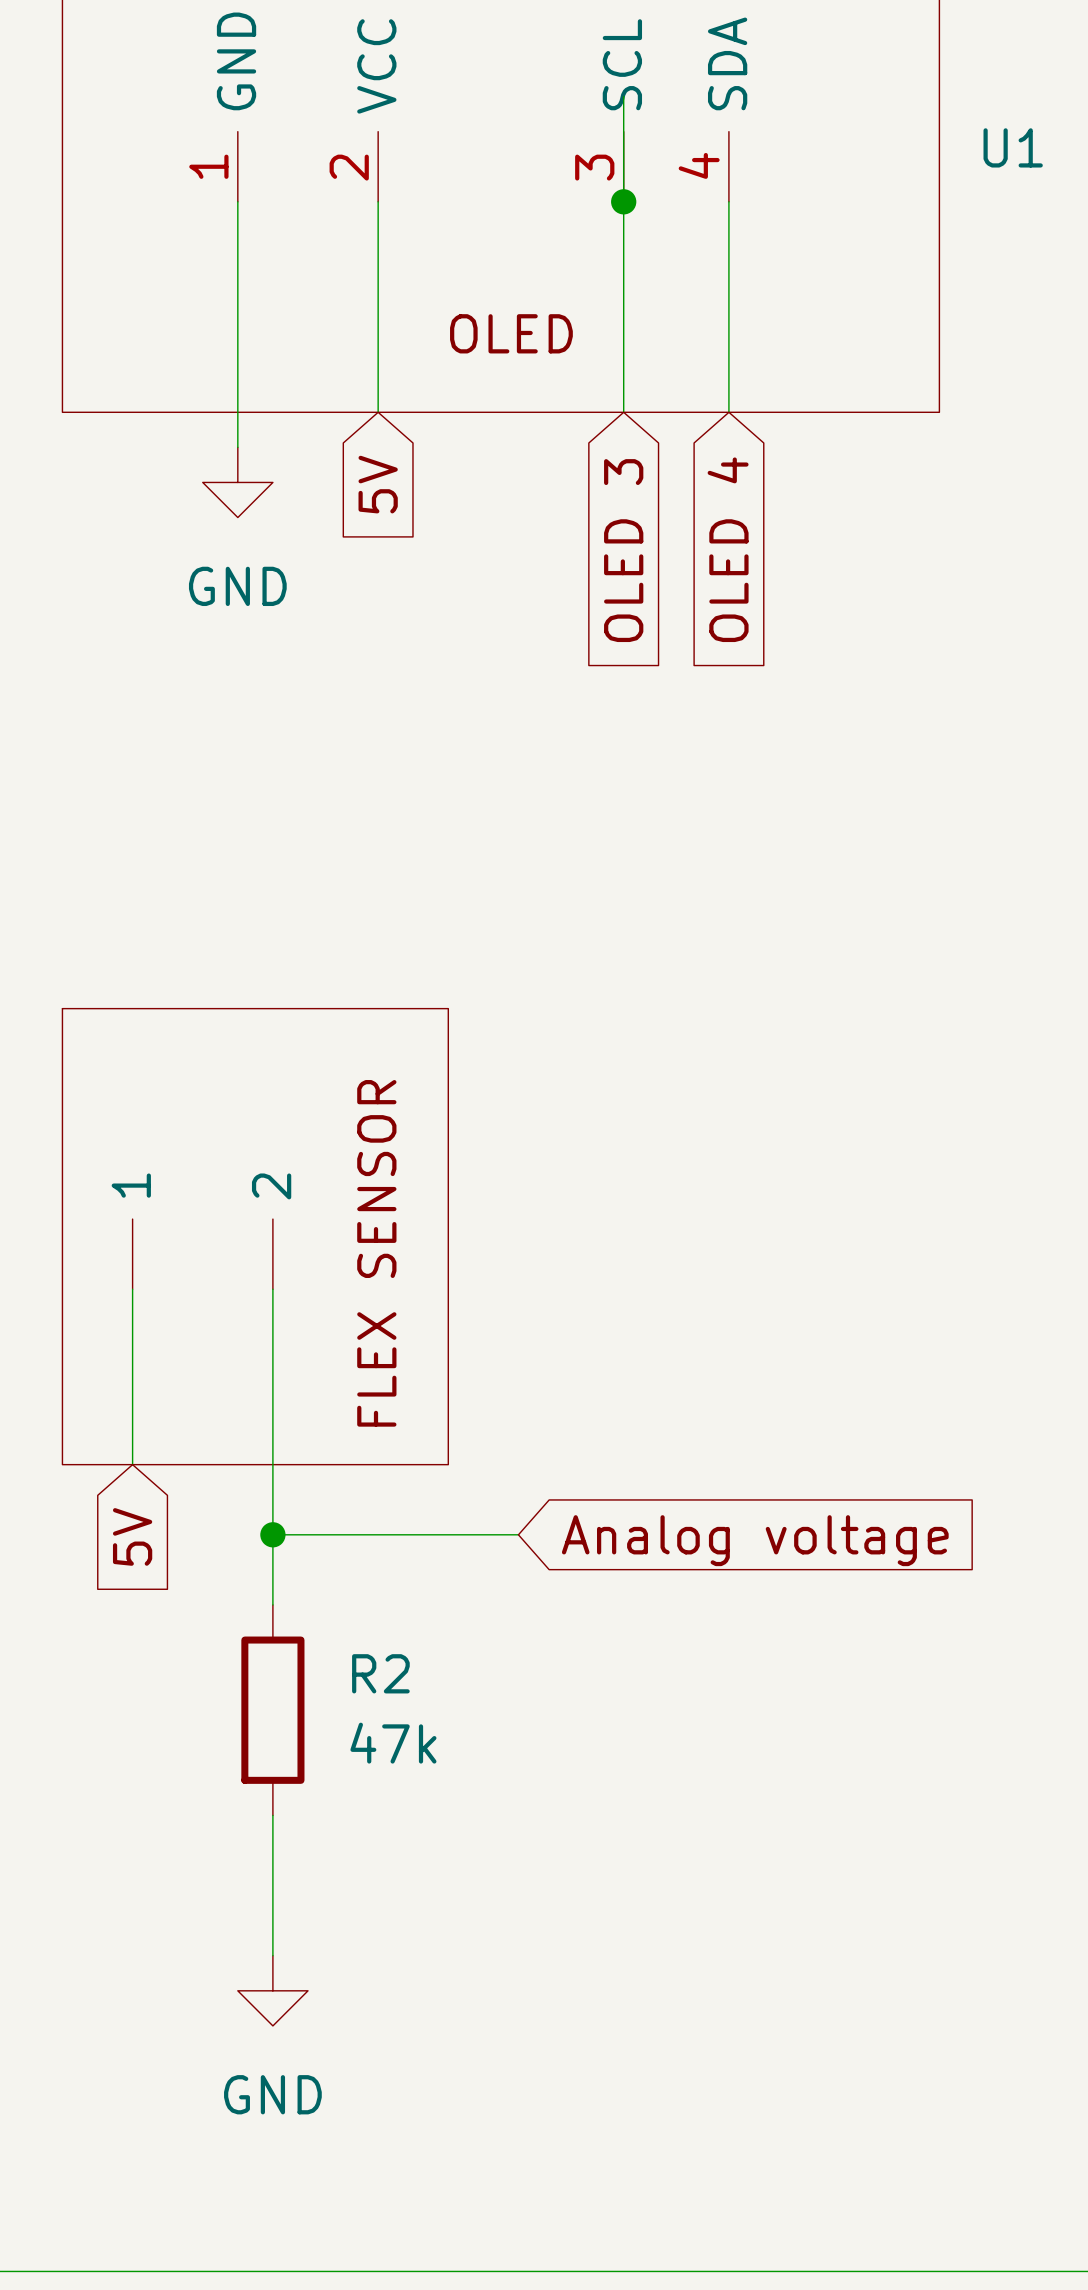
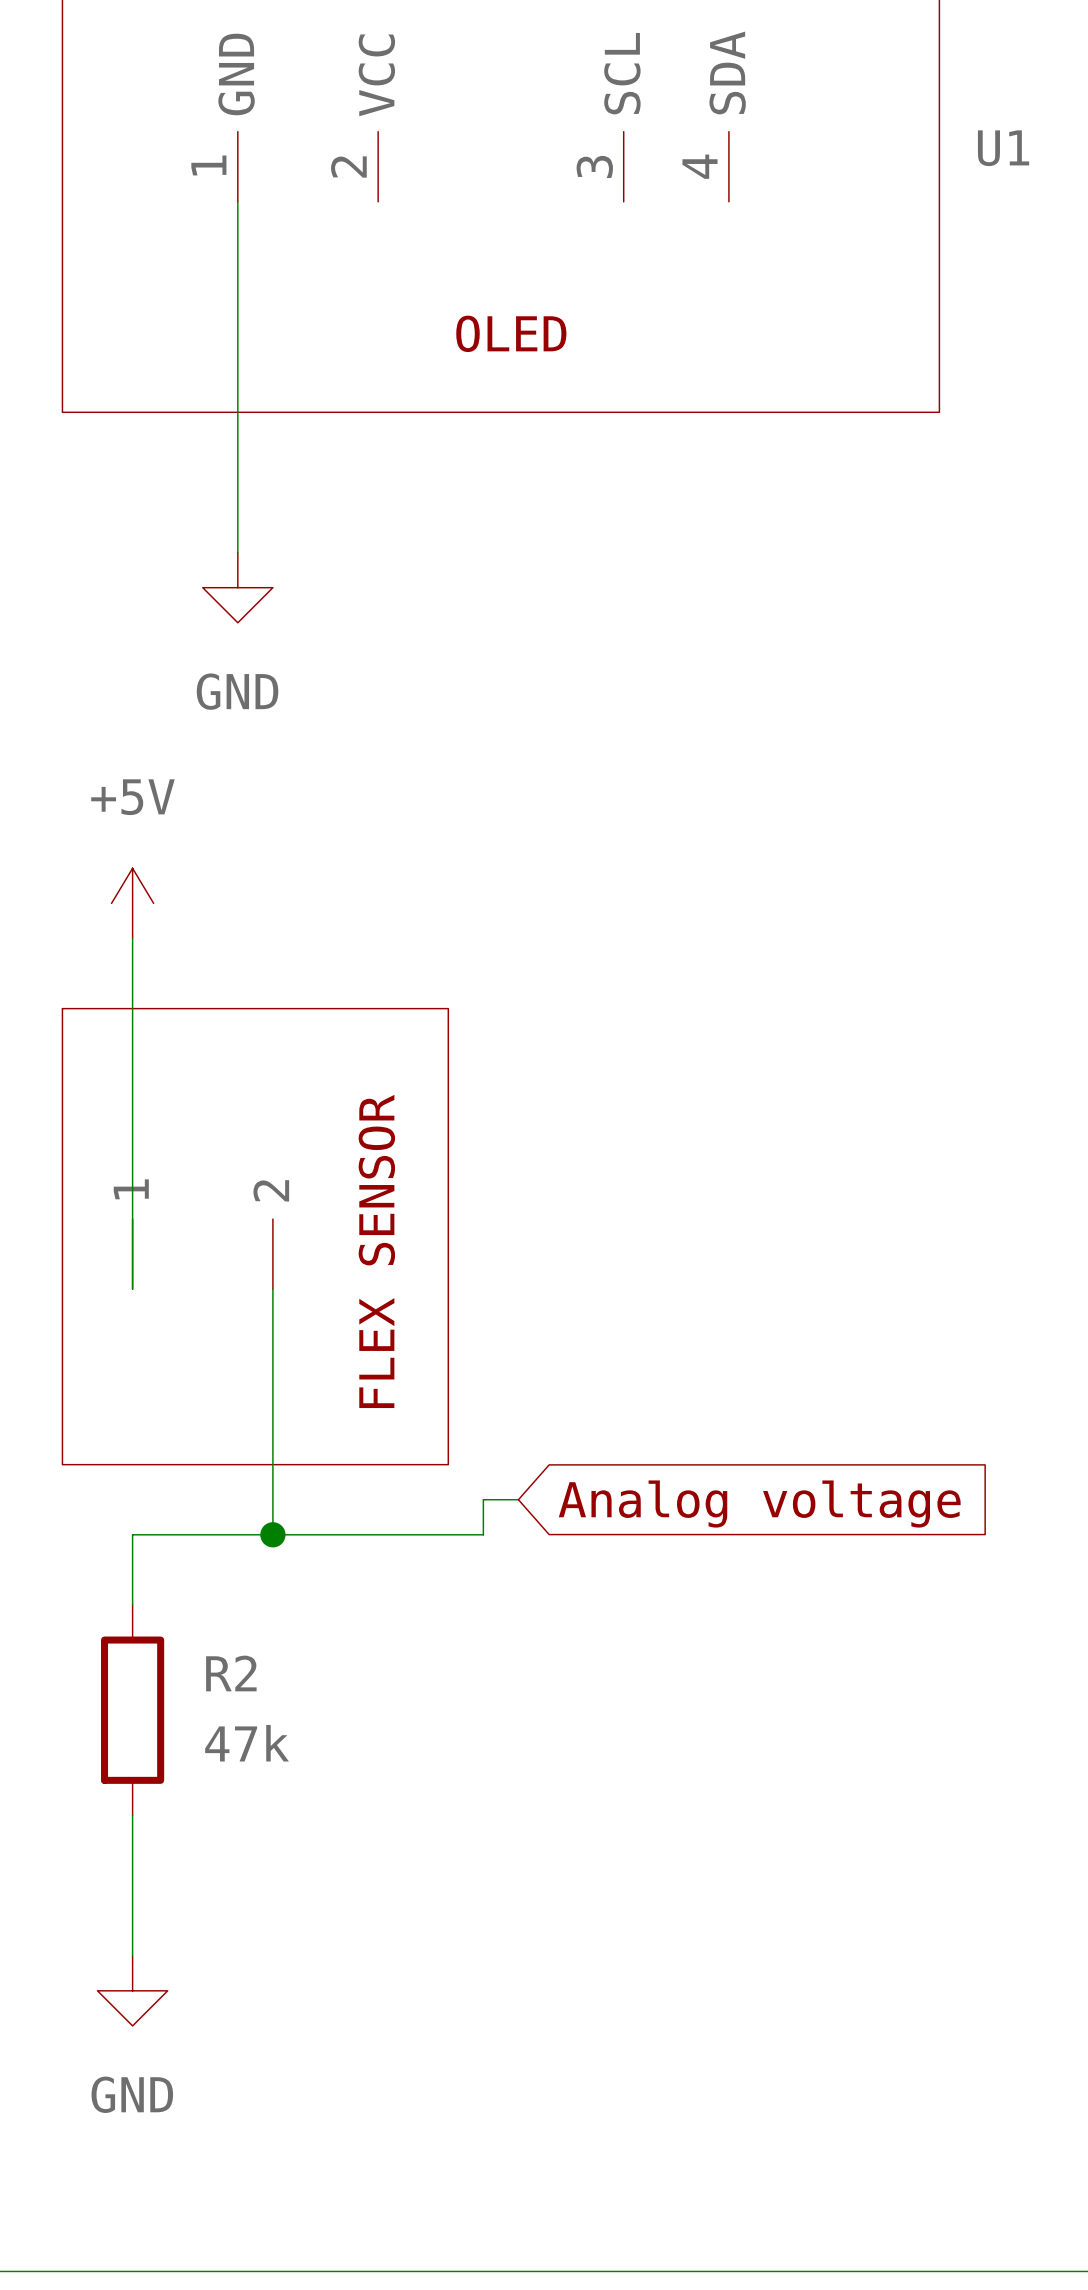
wire: (623, 96) (623, 412) -> none
wire: (378, 201) (378, 412) -> none
junction: (623, 201) -> none
wire: (728, 201) (728, 412) -> none
wire: none -> (237, 447) (237, 552)
power symbol position: GND (237, 482) -> GND (237, 587)
global label: 5V (378, 484) -> none
global label: OLED 4 (728, 549) -> none
global label: OLED 3 (623, 550) -> none
power symbol: none -> +5V (132, 903)
wire: (132, 1289) (132, 1464) -> (132, 1289) (132, 938)
wire: (272, 1534) (272, 1604) -> (272, 1534) (132, 1534) (132, 1604)
wire: (483, 1534) (518, 1534) -> (483, 1534) (483, 1499) (518, 1499)
global label: 5V (132, 1536) -> none
global label position: Analog voltage (755, 1540) -> Analog voltage (759, 1504)
R2 position: (272, 1710) -> (132, 1710)
wire: (272, 1815) (272, 1955) -> (132, 1815) (132, 1955)
power symbol position: GND (272, 1990) -> GND (132, 1990)

